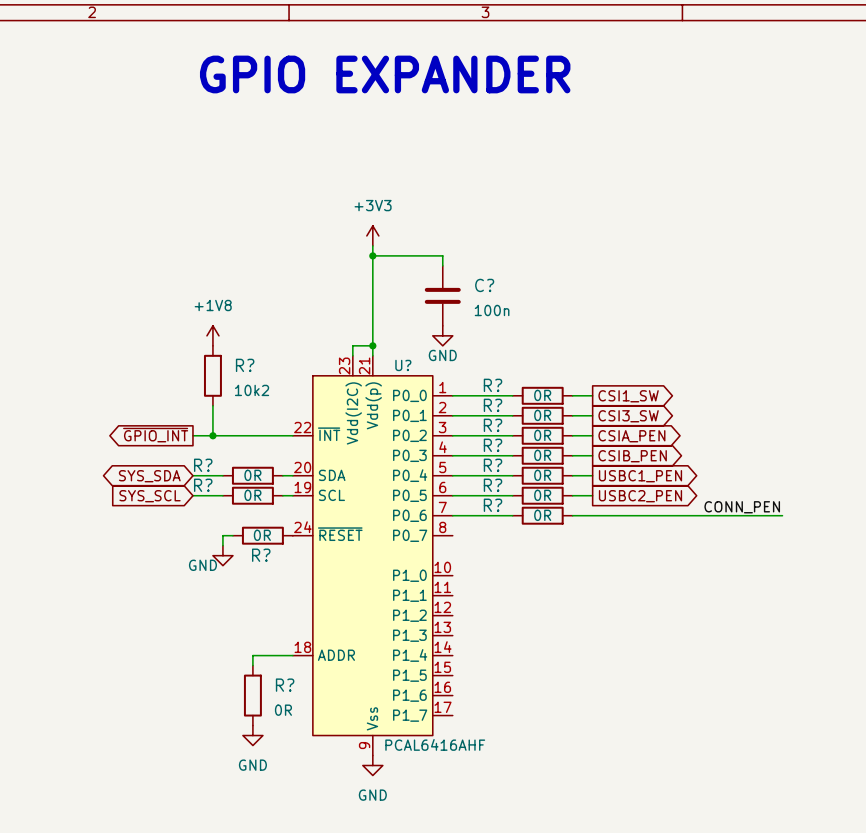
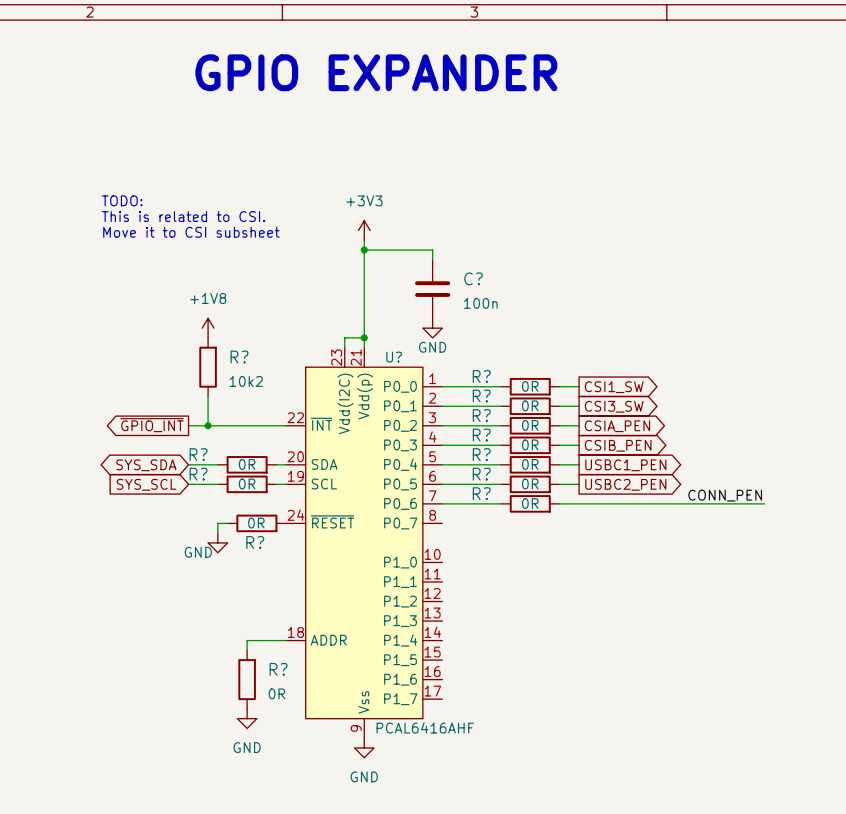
text: none -> TODO: (122, 200)
text: none -> This is related to CSI. (183, 216)
text: none -> Move it to CSI subsheet (191, 232)

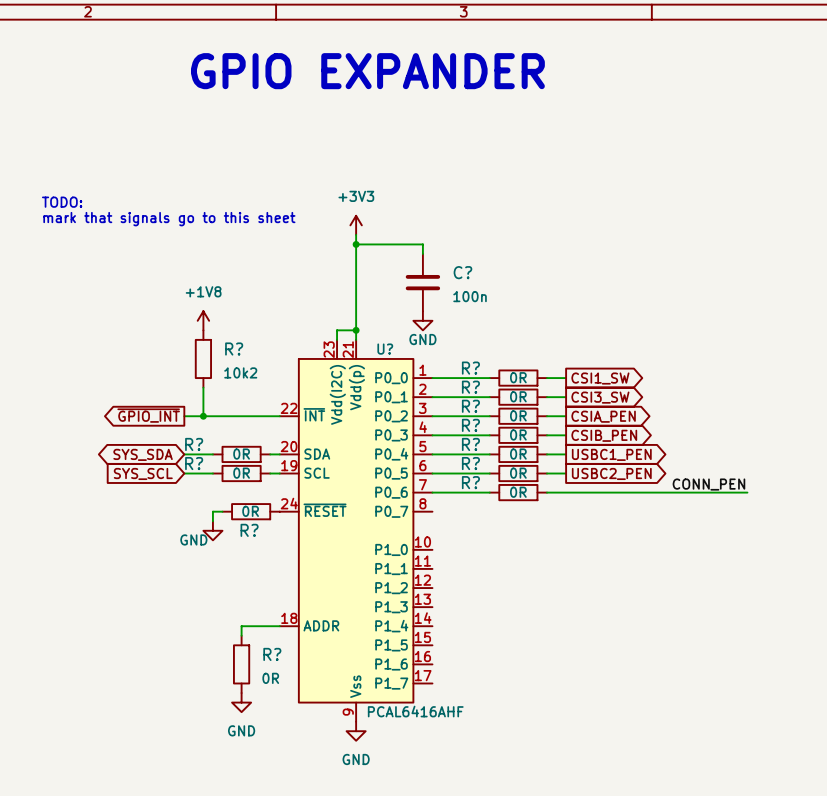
text position: TODO: (122, 200) -> TODO: (62, 202)
text: This is related to CSI. (183, 216) -> none
text: none -> mark that signals go to this sheet (169, 219)
text: Move it to CSI subsheet (191, 232) -> none

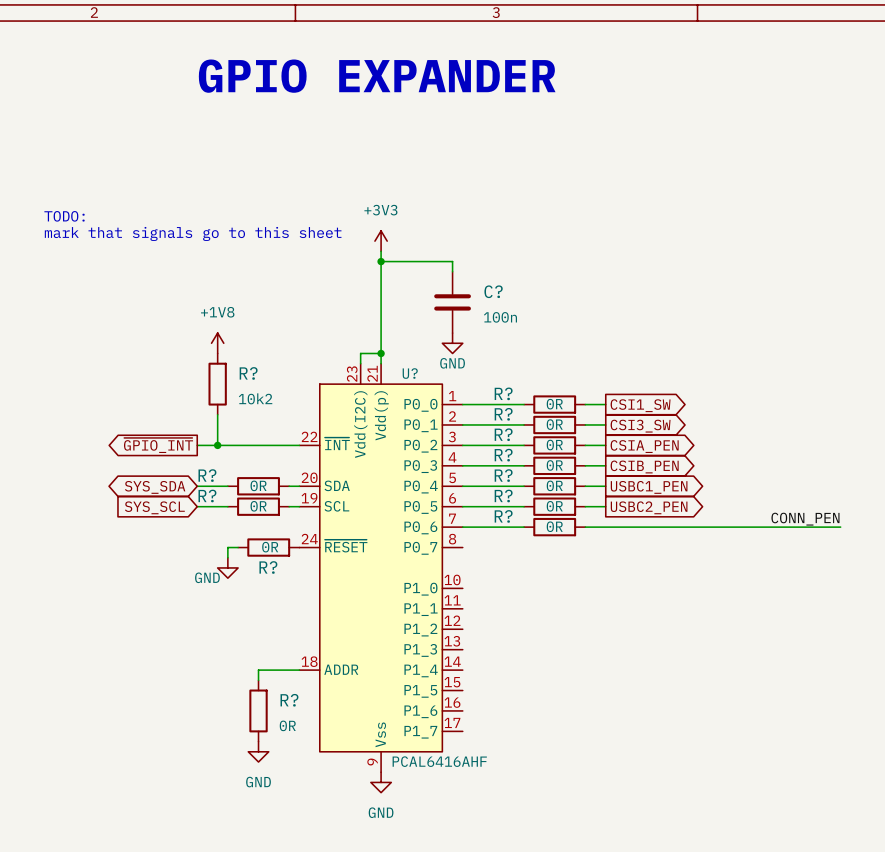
label position: CONN_PEN (708, 484) -> CONN_PEN (805, 519)
wire: none -> (799, 527) (840, 527)

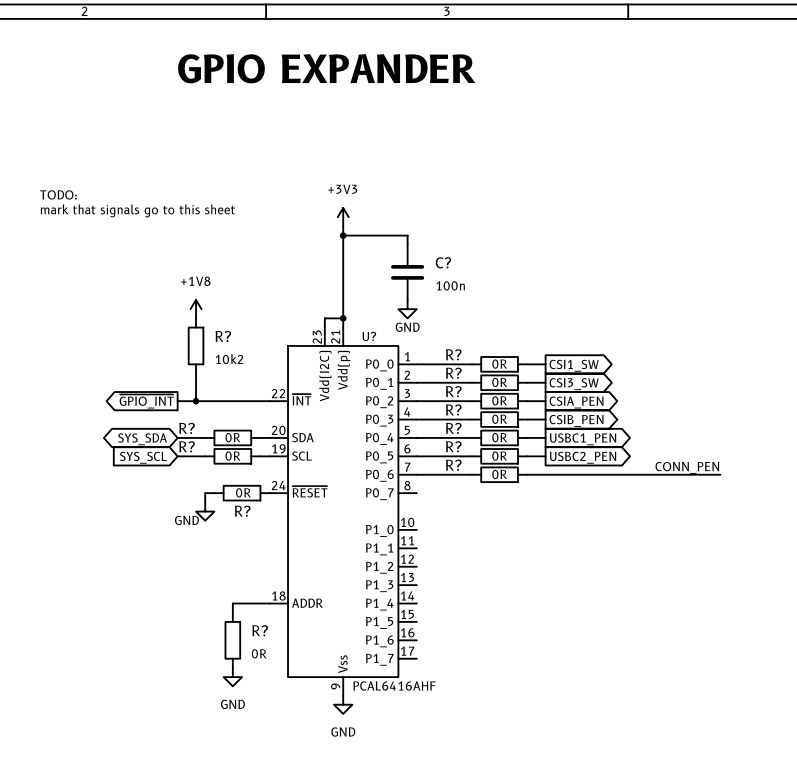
label position: CONN_PEN (805, 519) -> CONN_PEN (687, 467)
wire: (799, 527) (840, 527) -> none

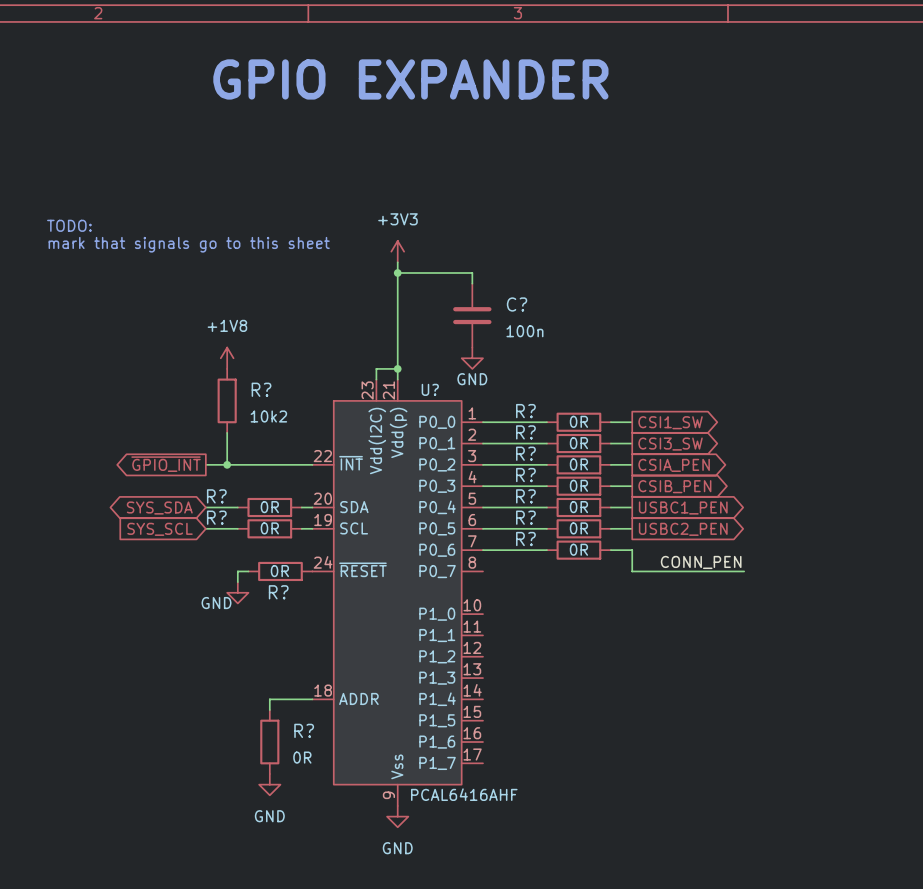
label position: CONN_PEN (687, 467) -> CONN_PEN (701, 562)
wire: (545, 474) (720, 474) -> (632, 550) (632, 571) (744, 571)

